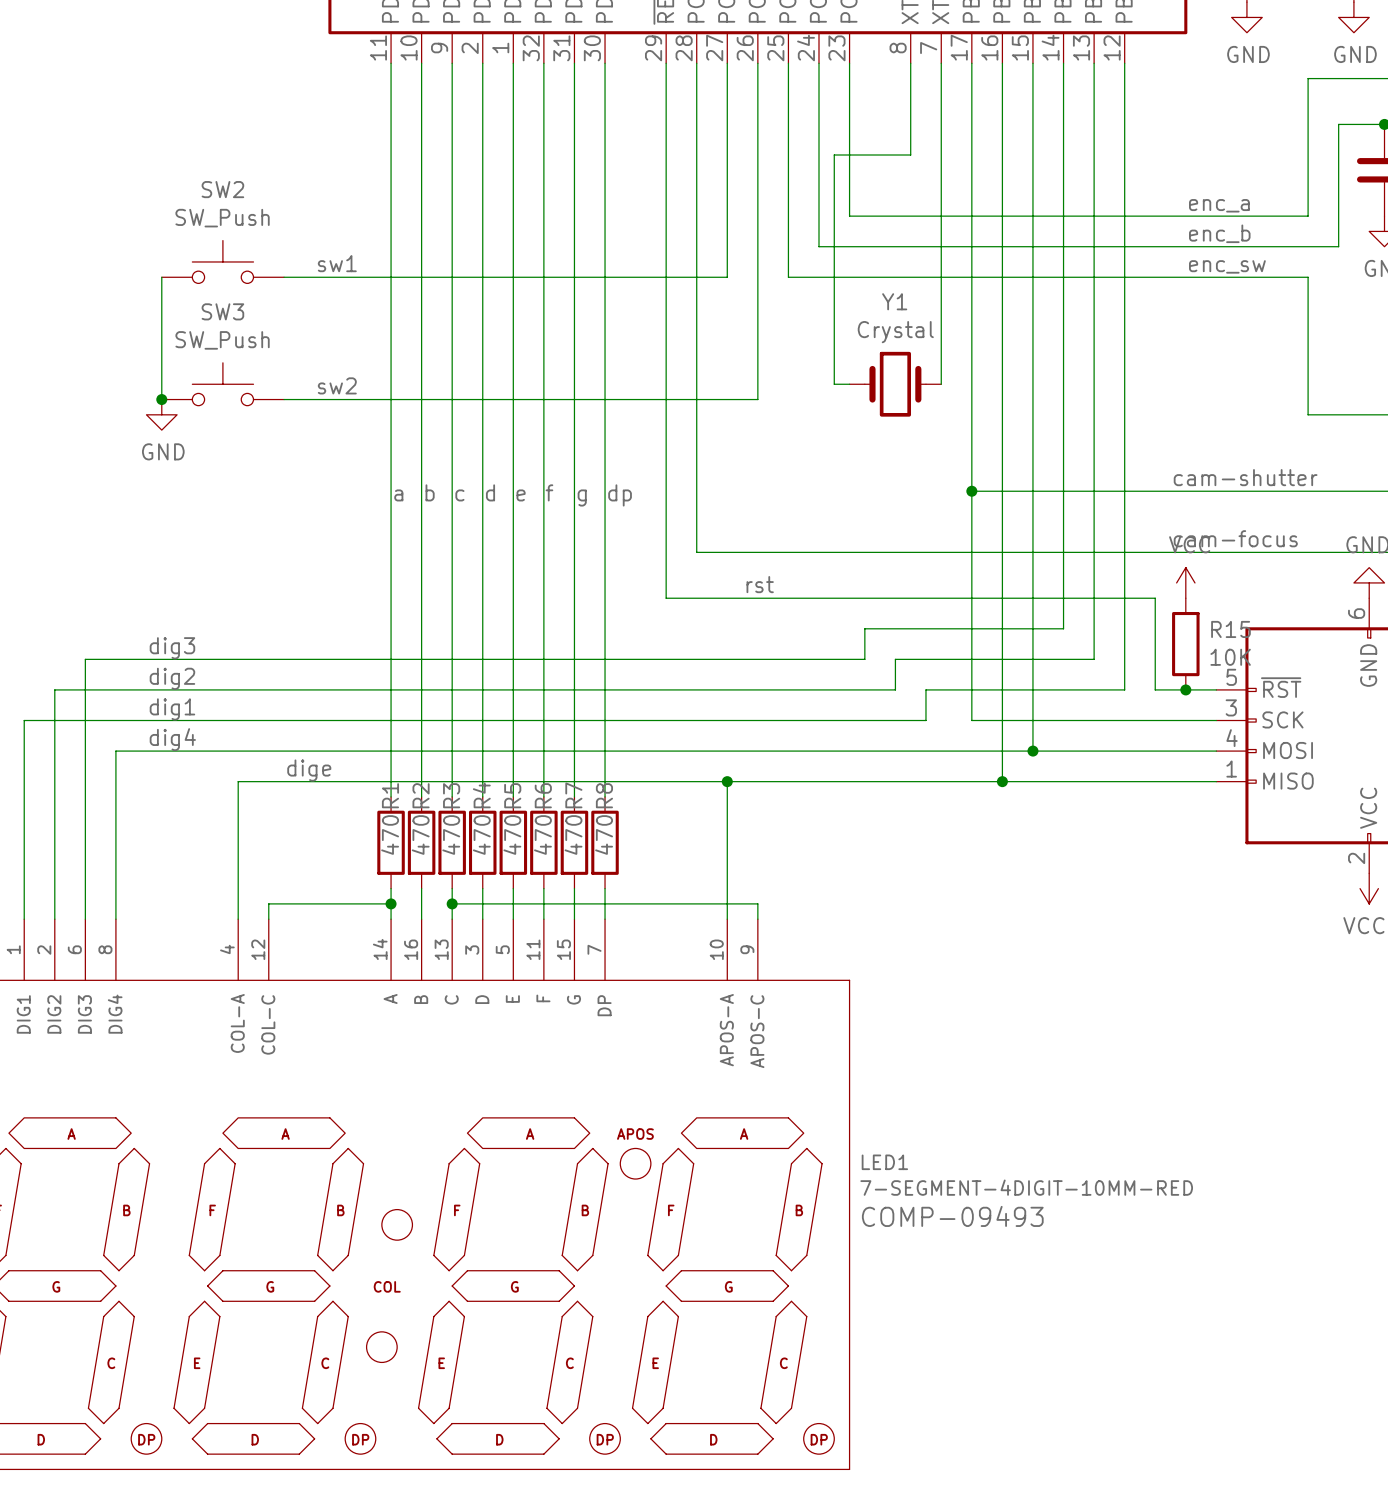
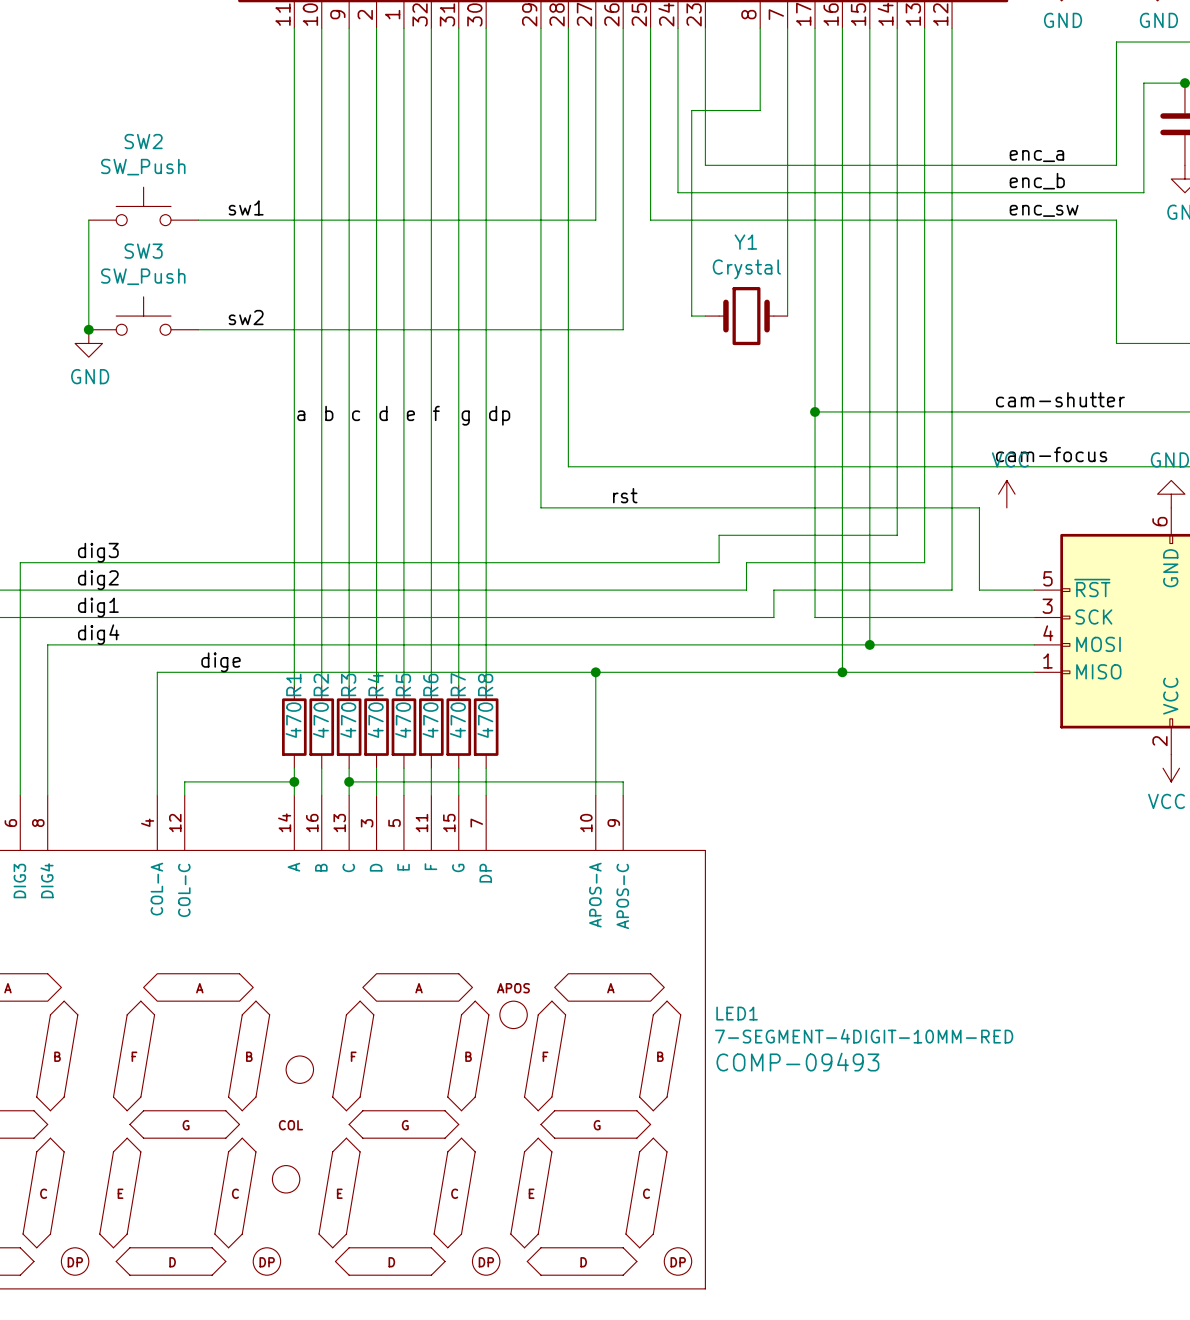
R15: 10K (1185, 644) -> none
junction: (1185, 689) -> none

